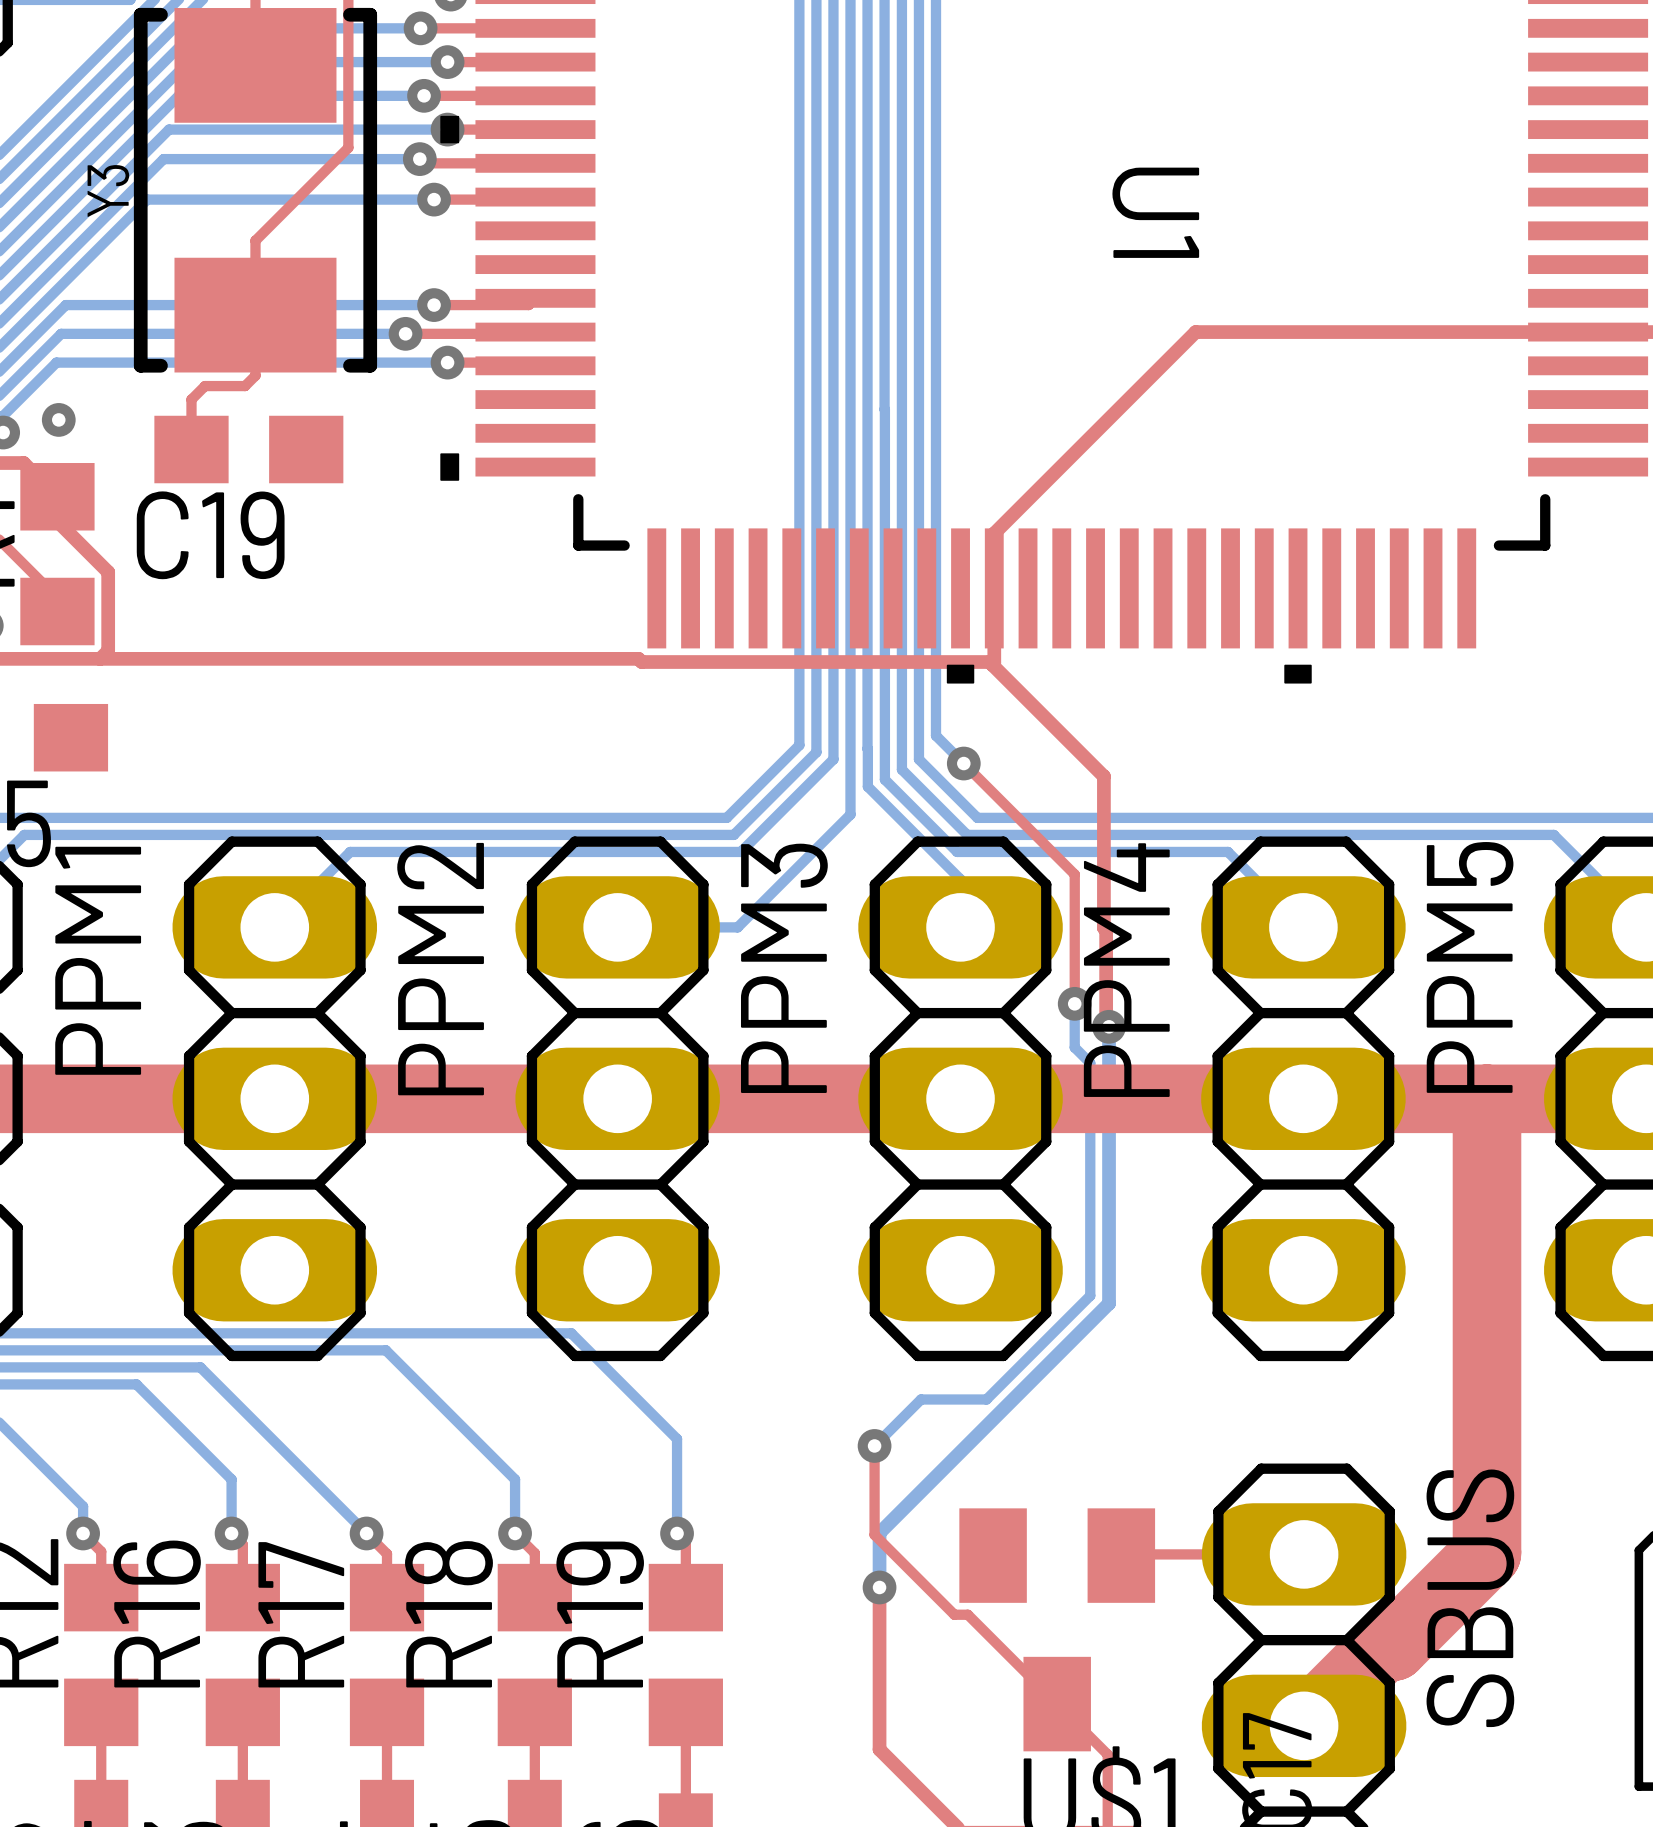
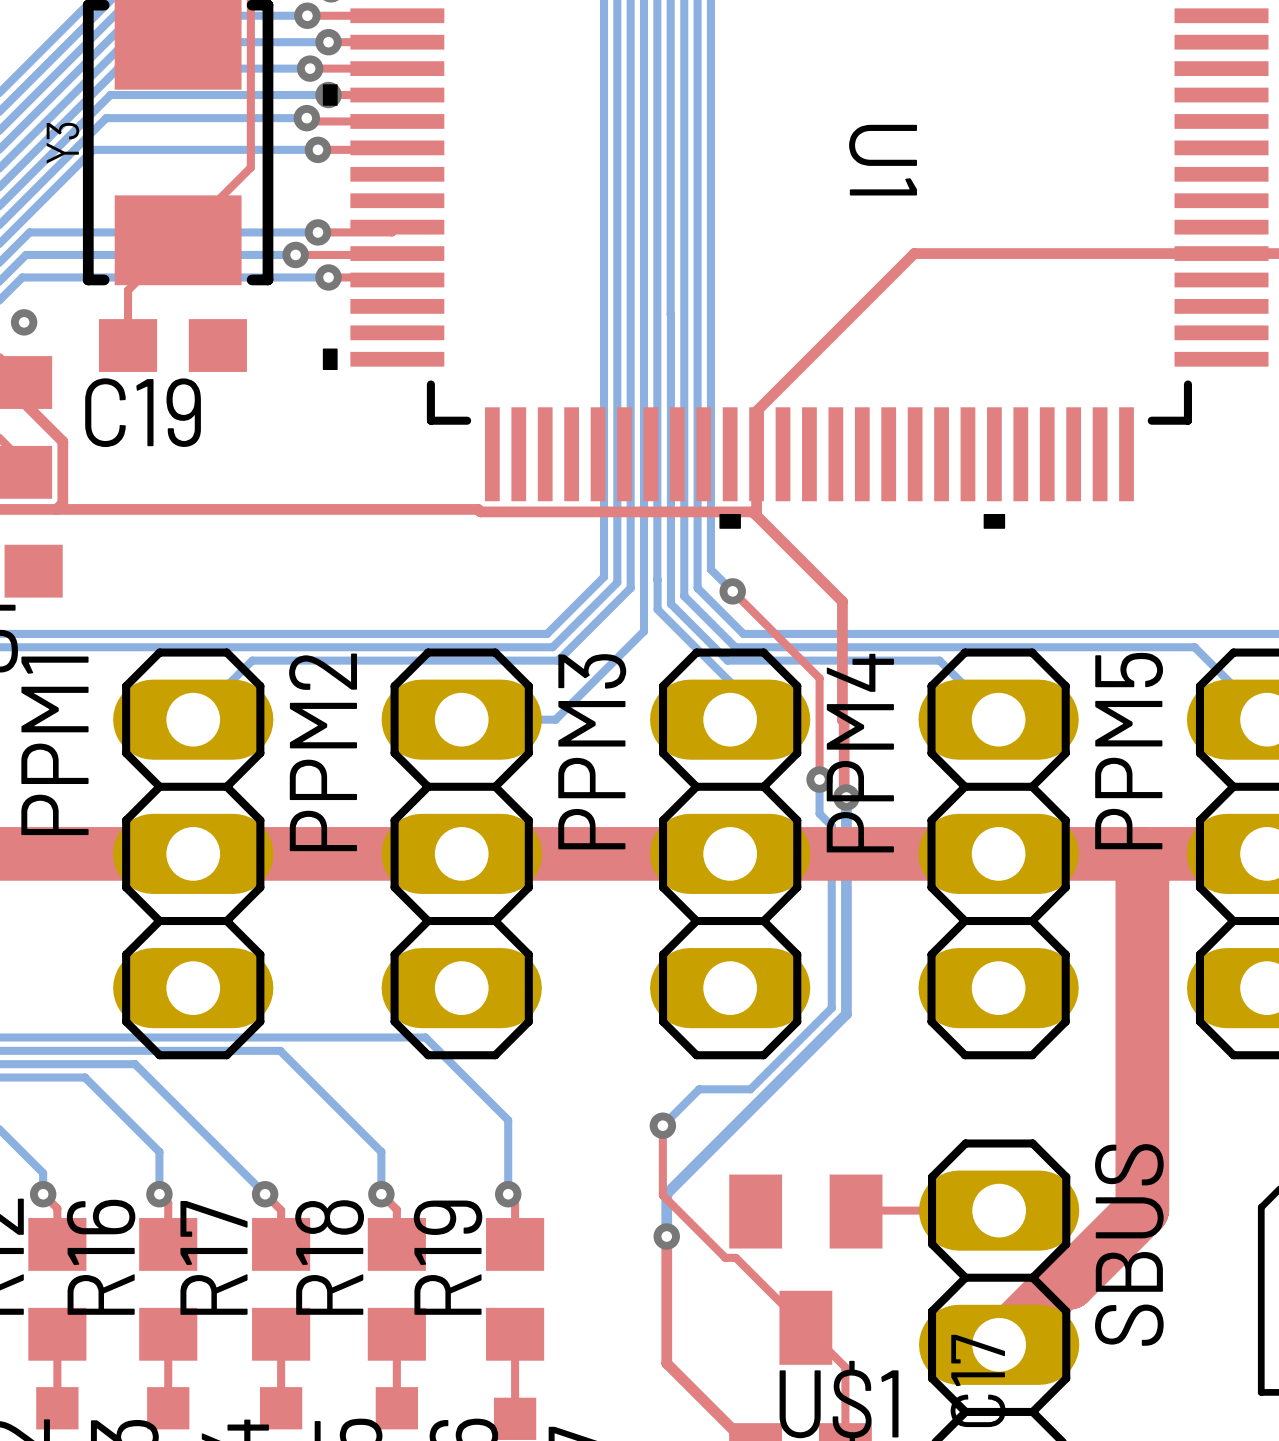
top track: (348, 147) (255, 240) (255, 375) (245, 386) (204, 386) (191, 399) -> (250, 109) (250, 167) (128, 290) (128, 306)

